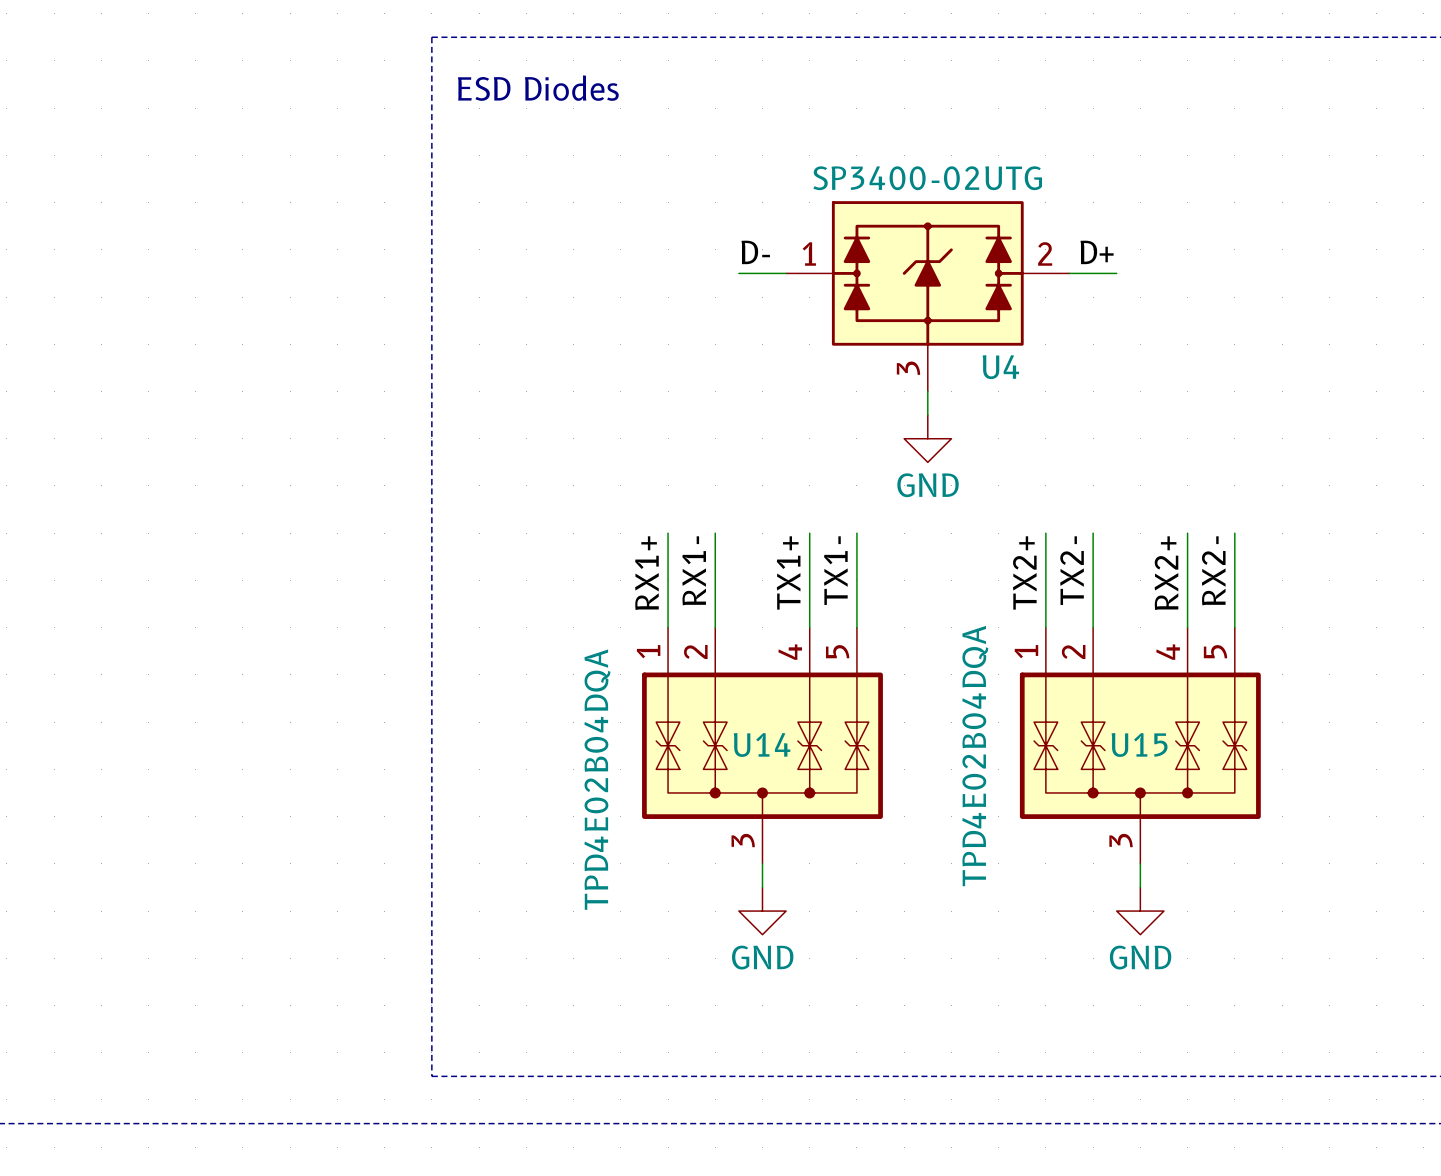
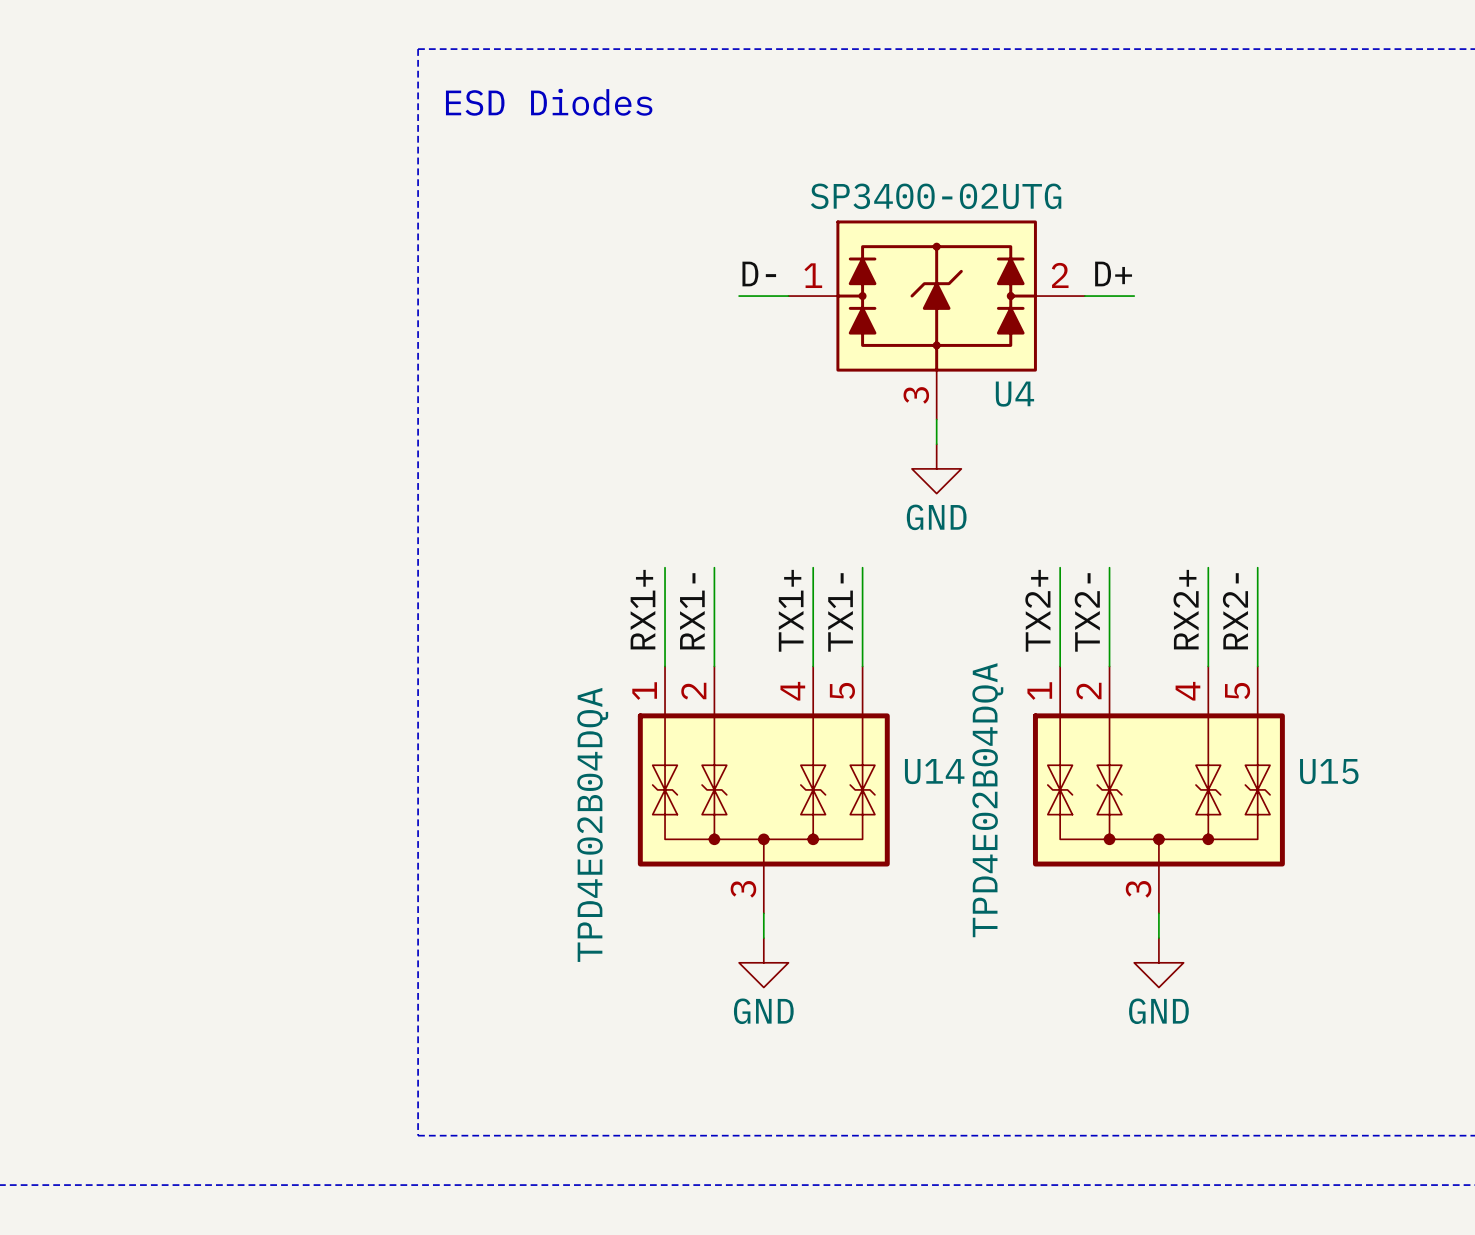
U14 name position: U14 (762, 744) -> U14 (934, 771)
U15 name position: U15 (1139, 744) -> U15 (1329, 771)

